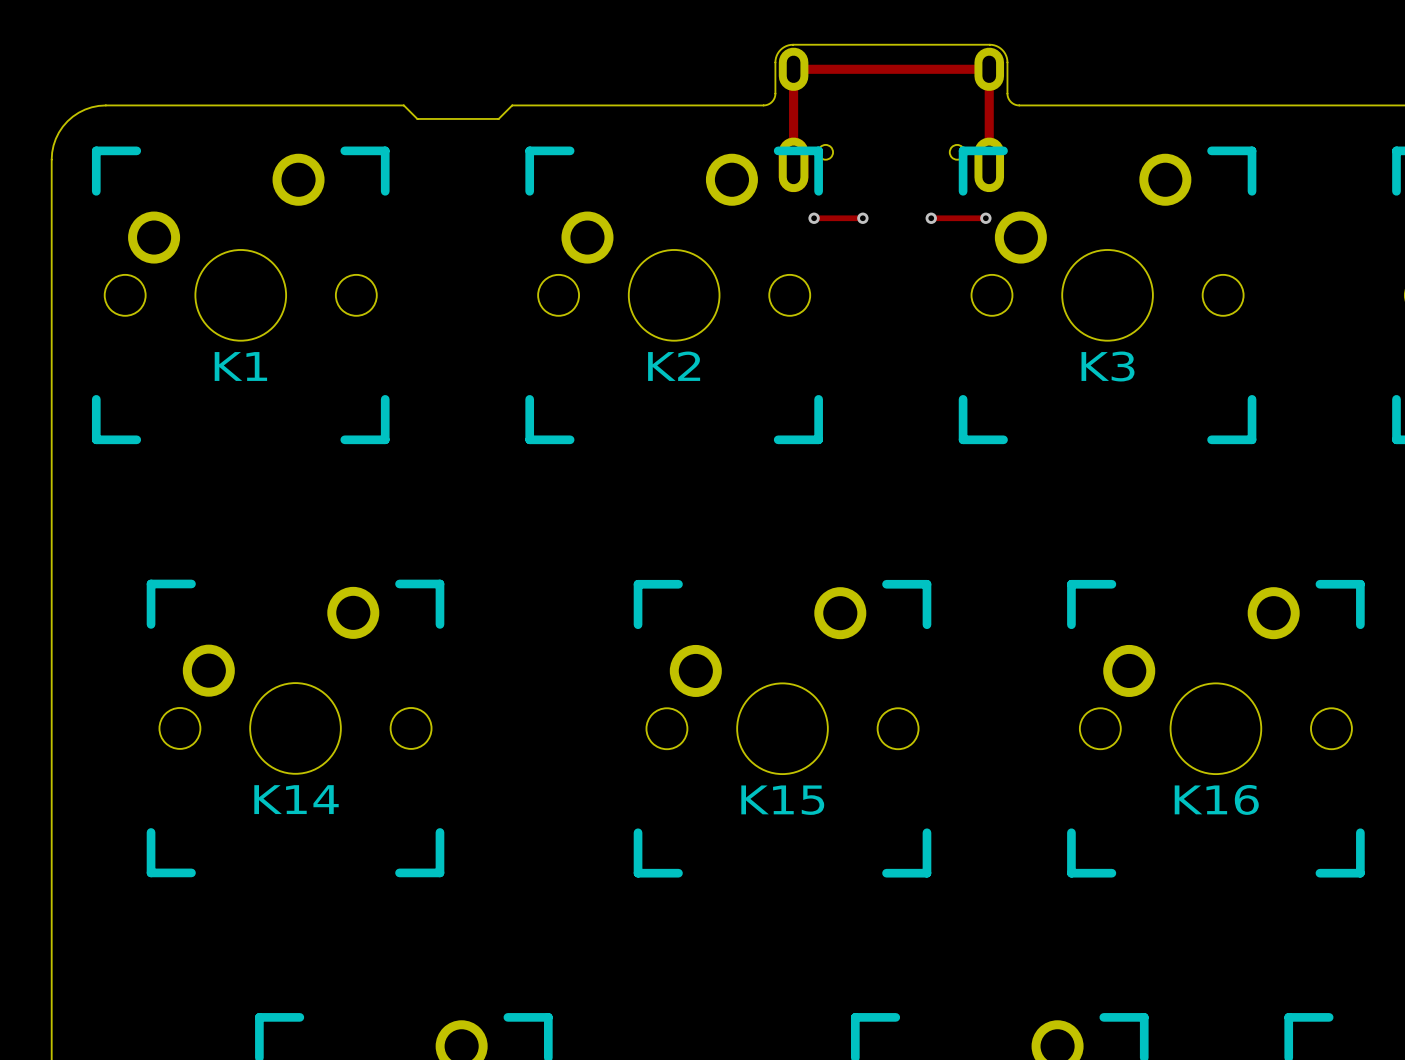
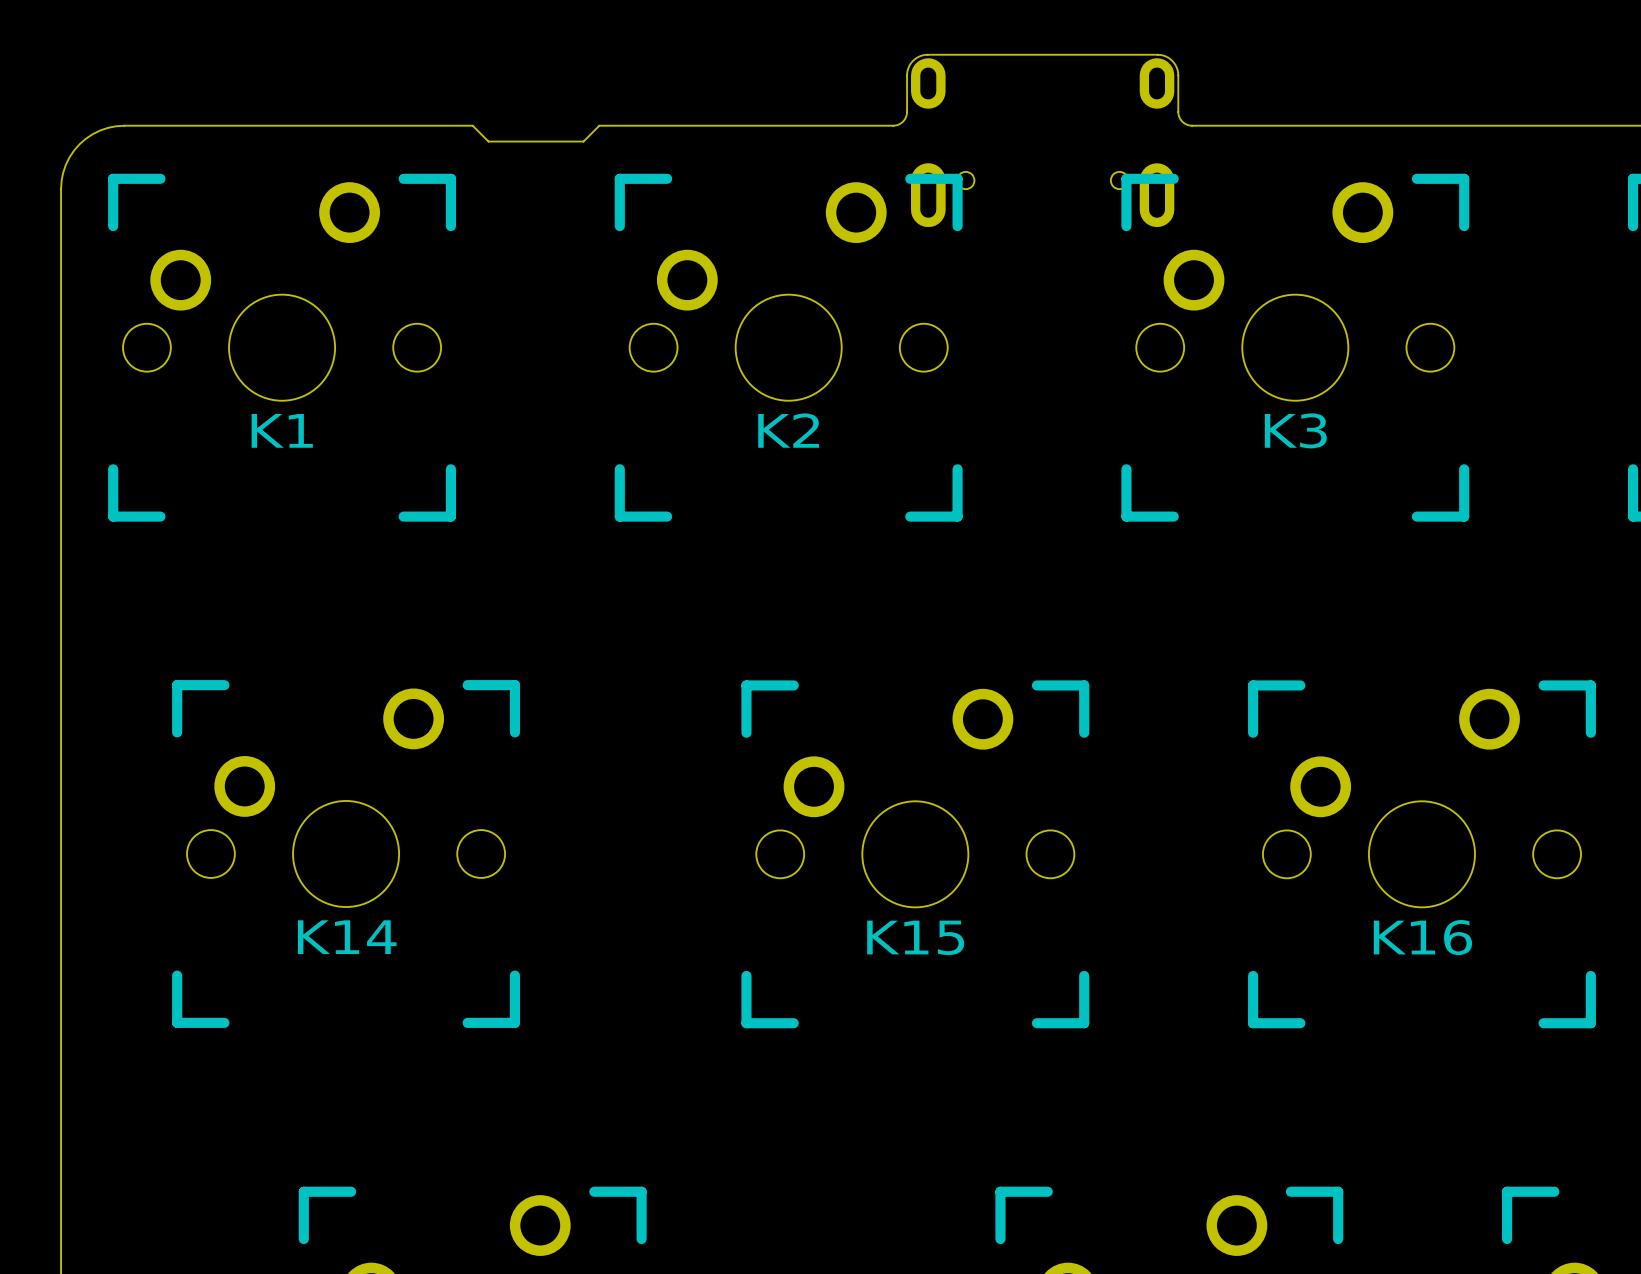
track: (793, 164) (793, 69) (989, 69) (989, 164) -> none
track: (814, 218) (862, 218) -> none
via: (814, 218) -> none
via: (862, 218) -> none
track: (931, 218) (985, 218) -> none
via: (931, 218) -> none
via: (985, 218) -> none

